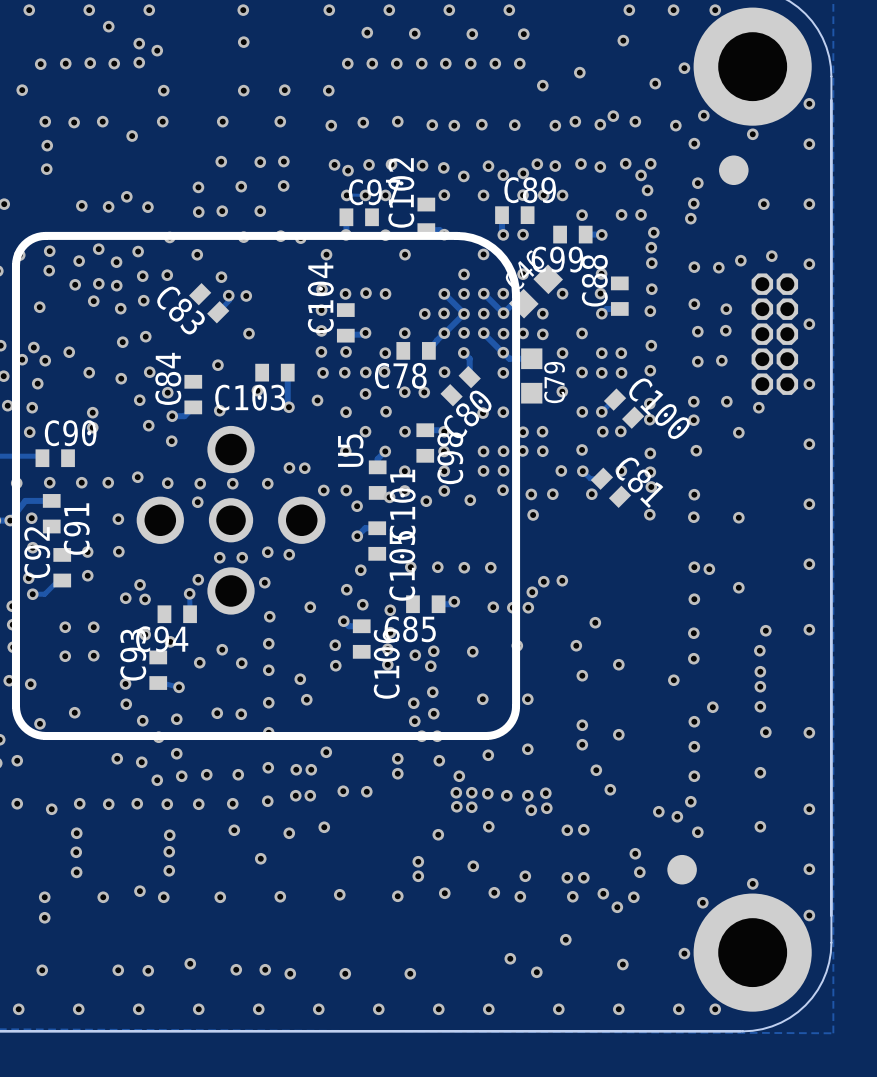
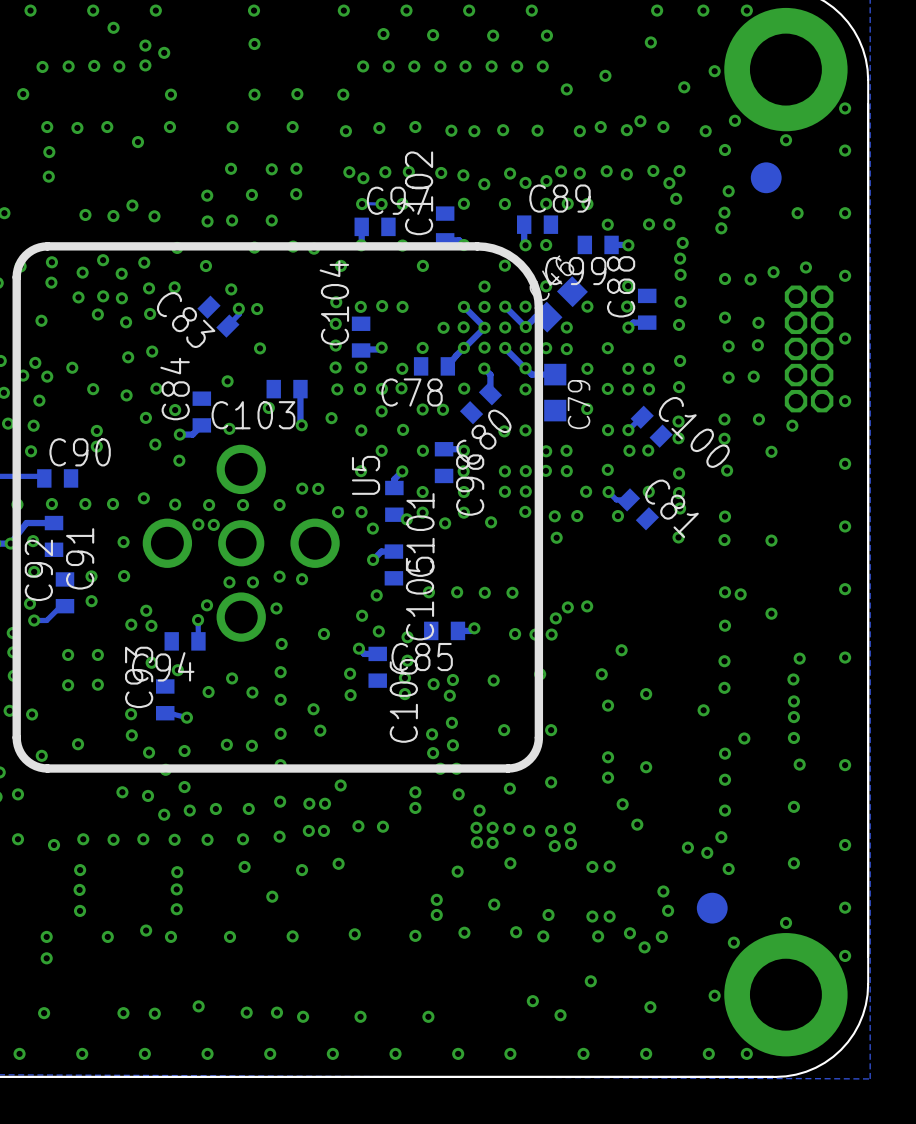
via: none -> (198, 524)
via: (197, 502) -> none
via: none -> (213, 524)

